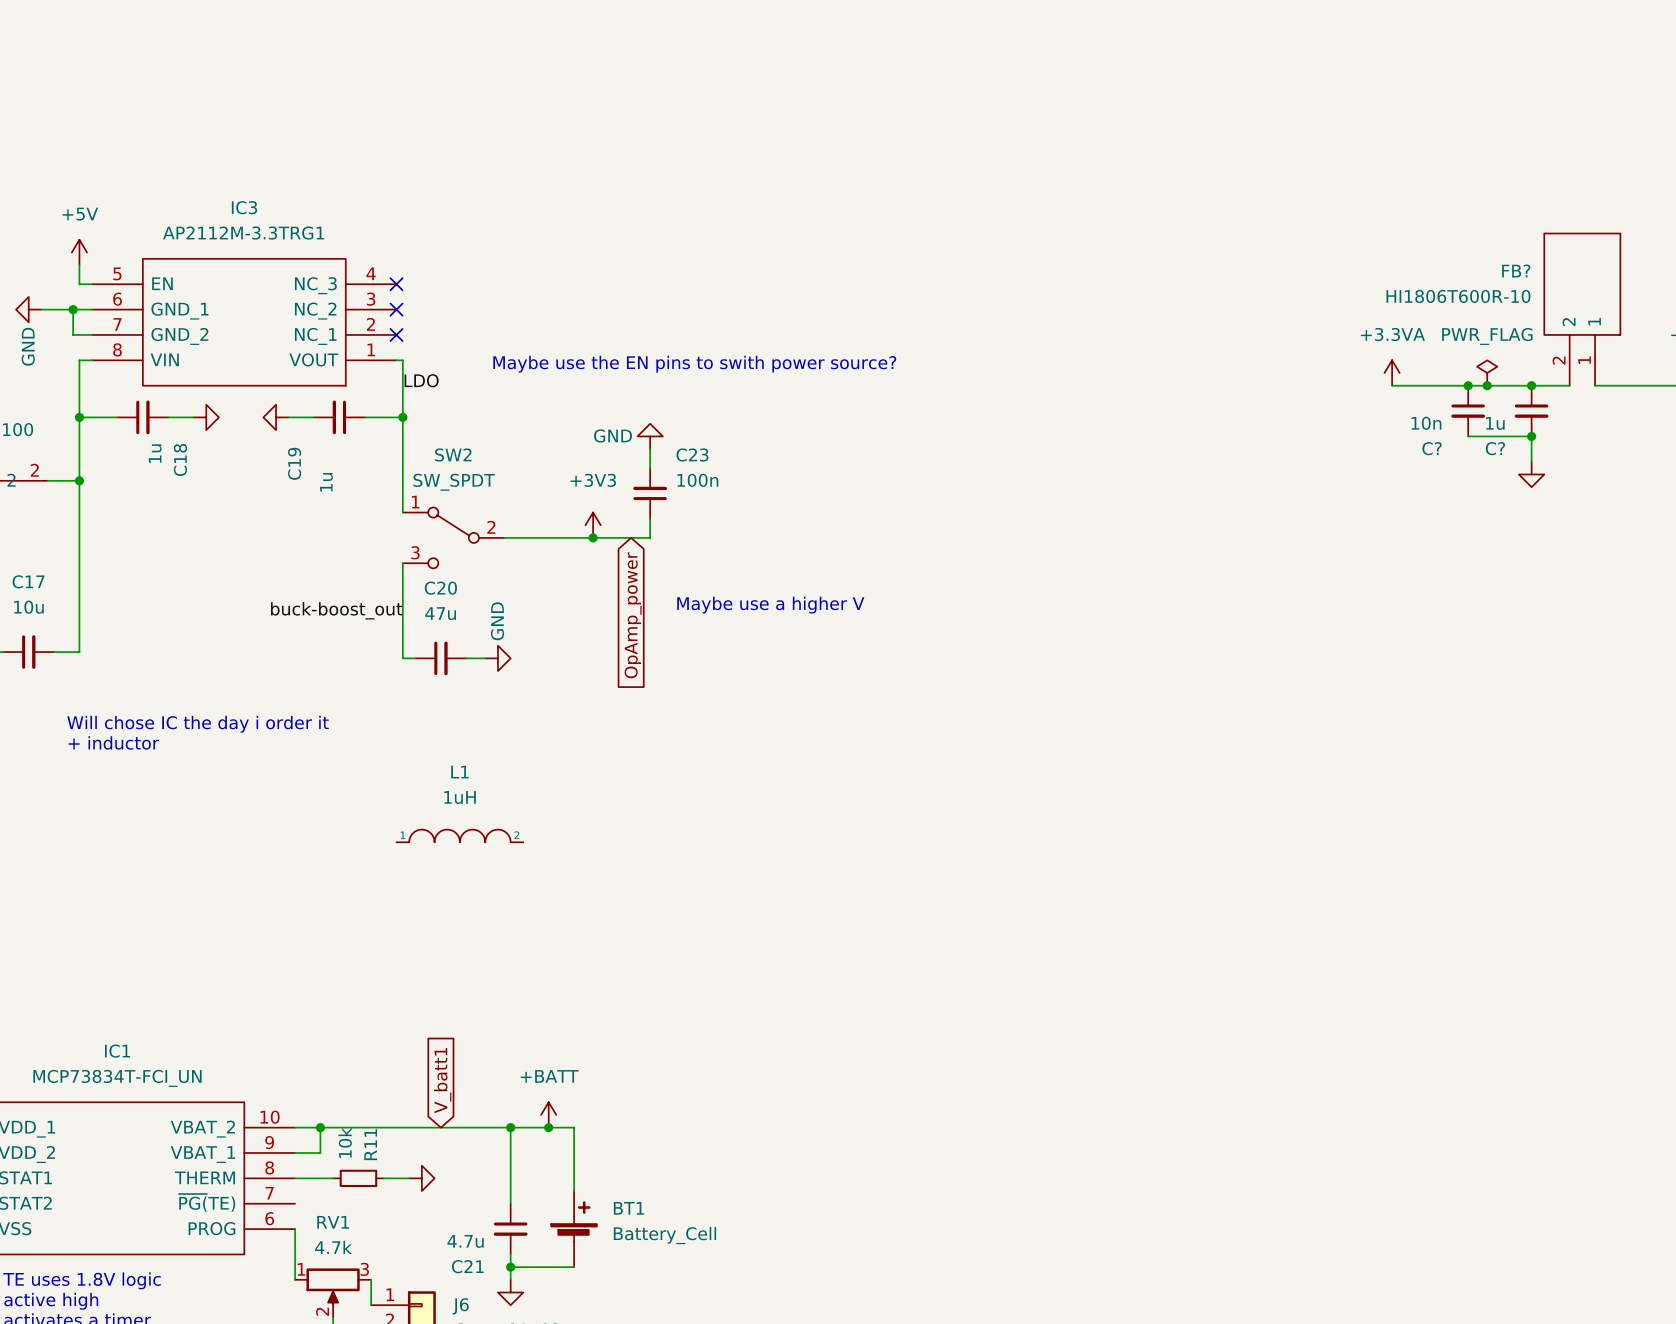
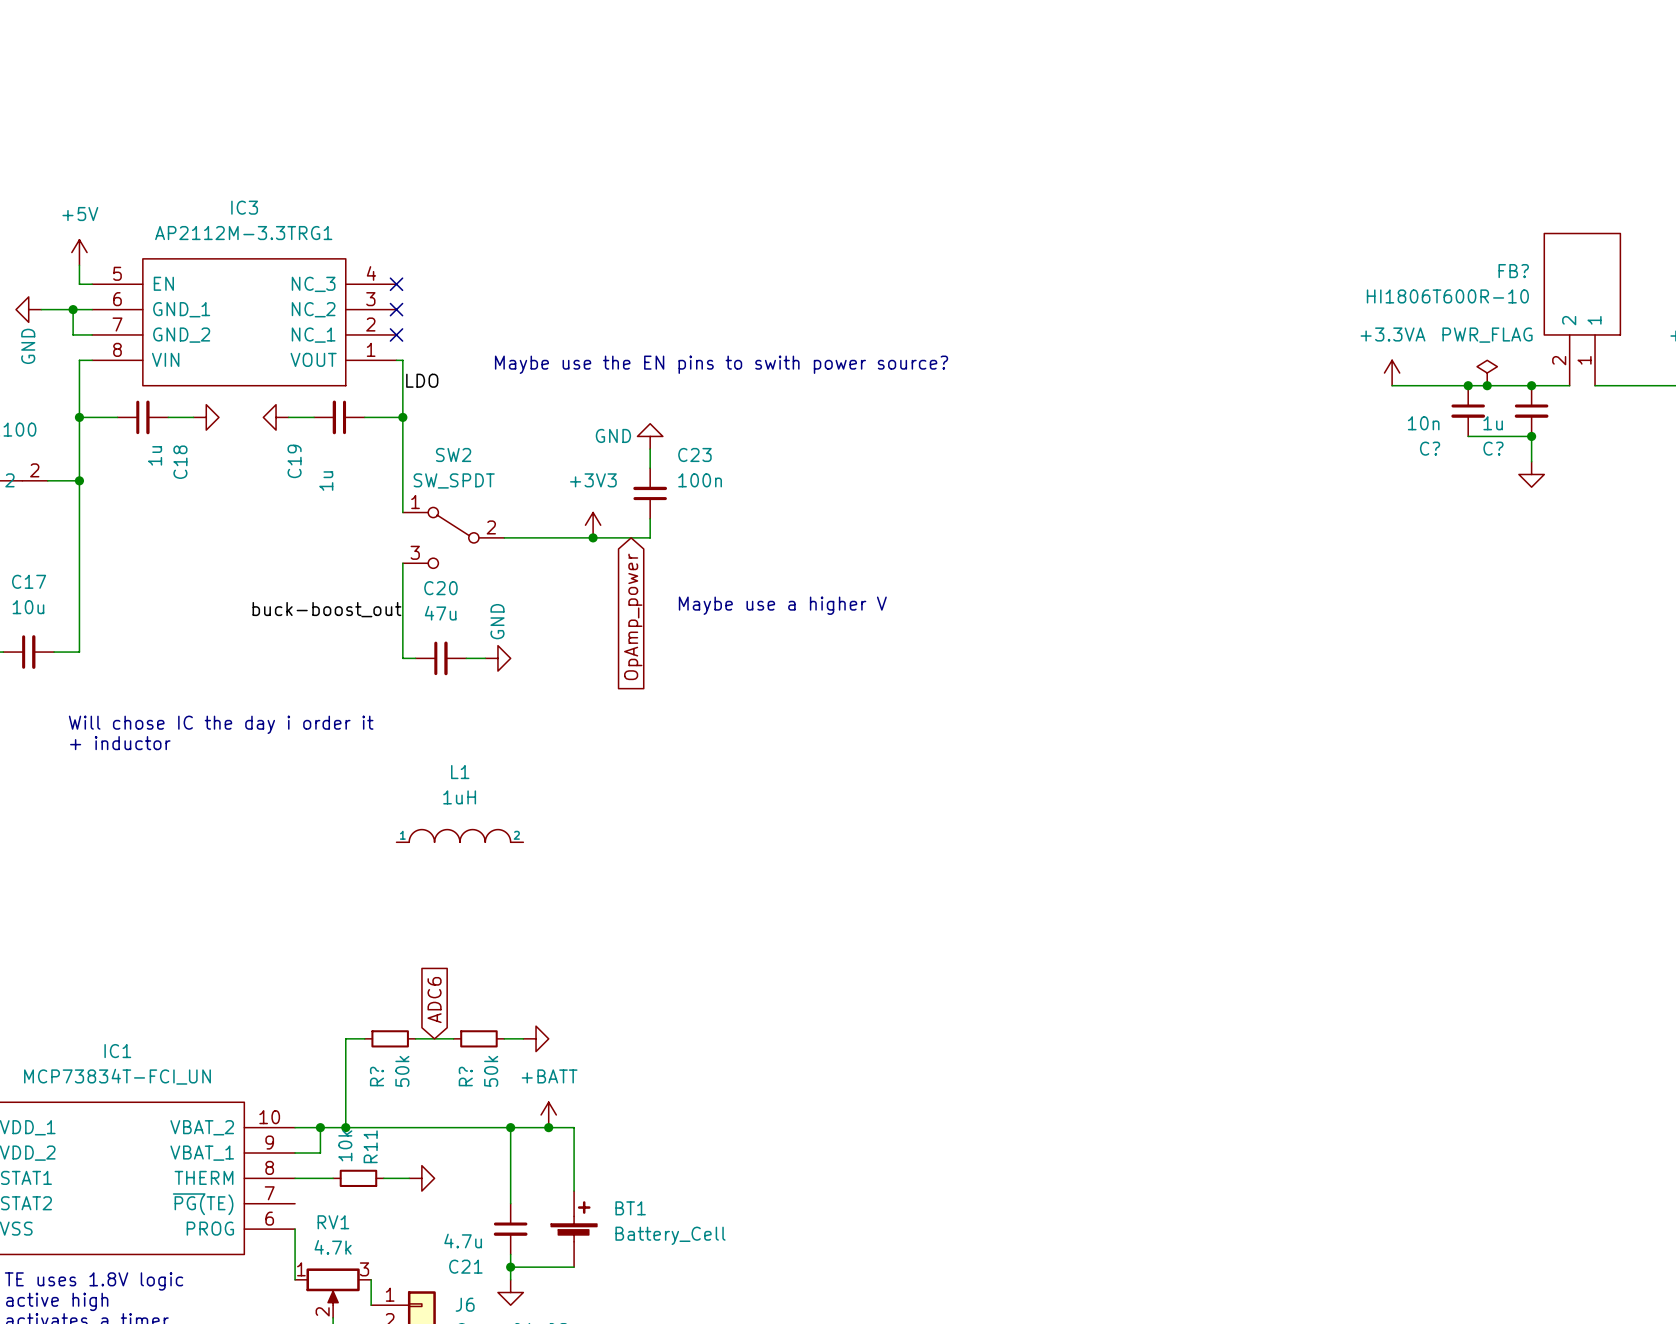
global label: none -> ADC6 (434, 1000)
wire: none -> (364, 1038) (345, 1038) (345, 1127)
R?: none -> 50k (390, 1038)
wire: none -> (415, 1038) (453, 1038)
R?: none -> 50k (478, 1038)
wire: none -> (504, 1038) (523, 1038)
power symbol: none -> (536, 1038)
global label: V_batt1 (442, 1080) -> none
junction: none -> (345, 1127)

